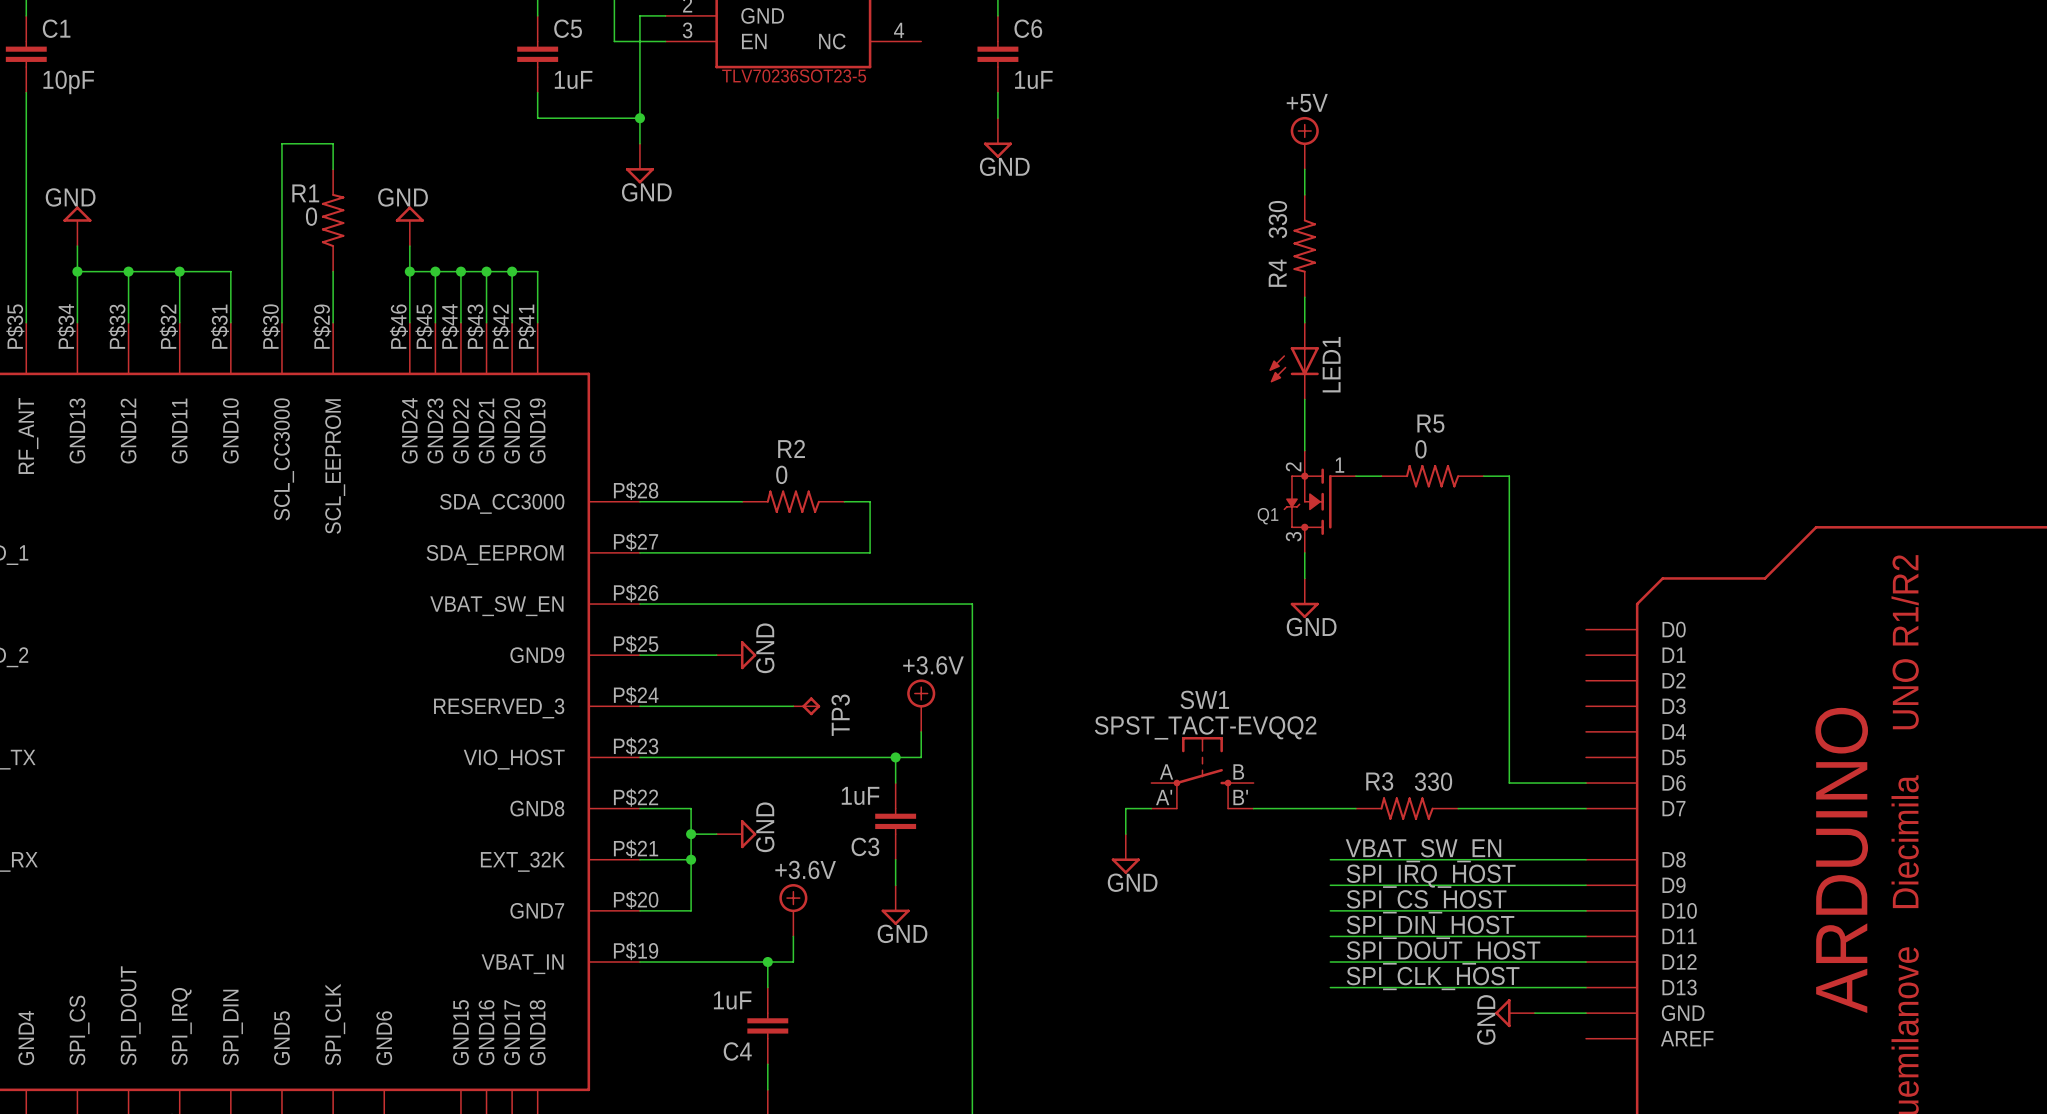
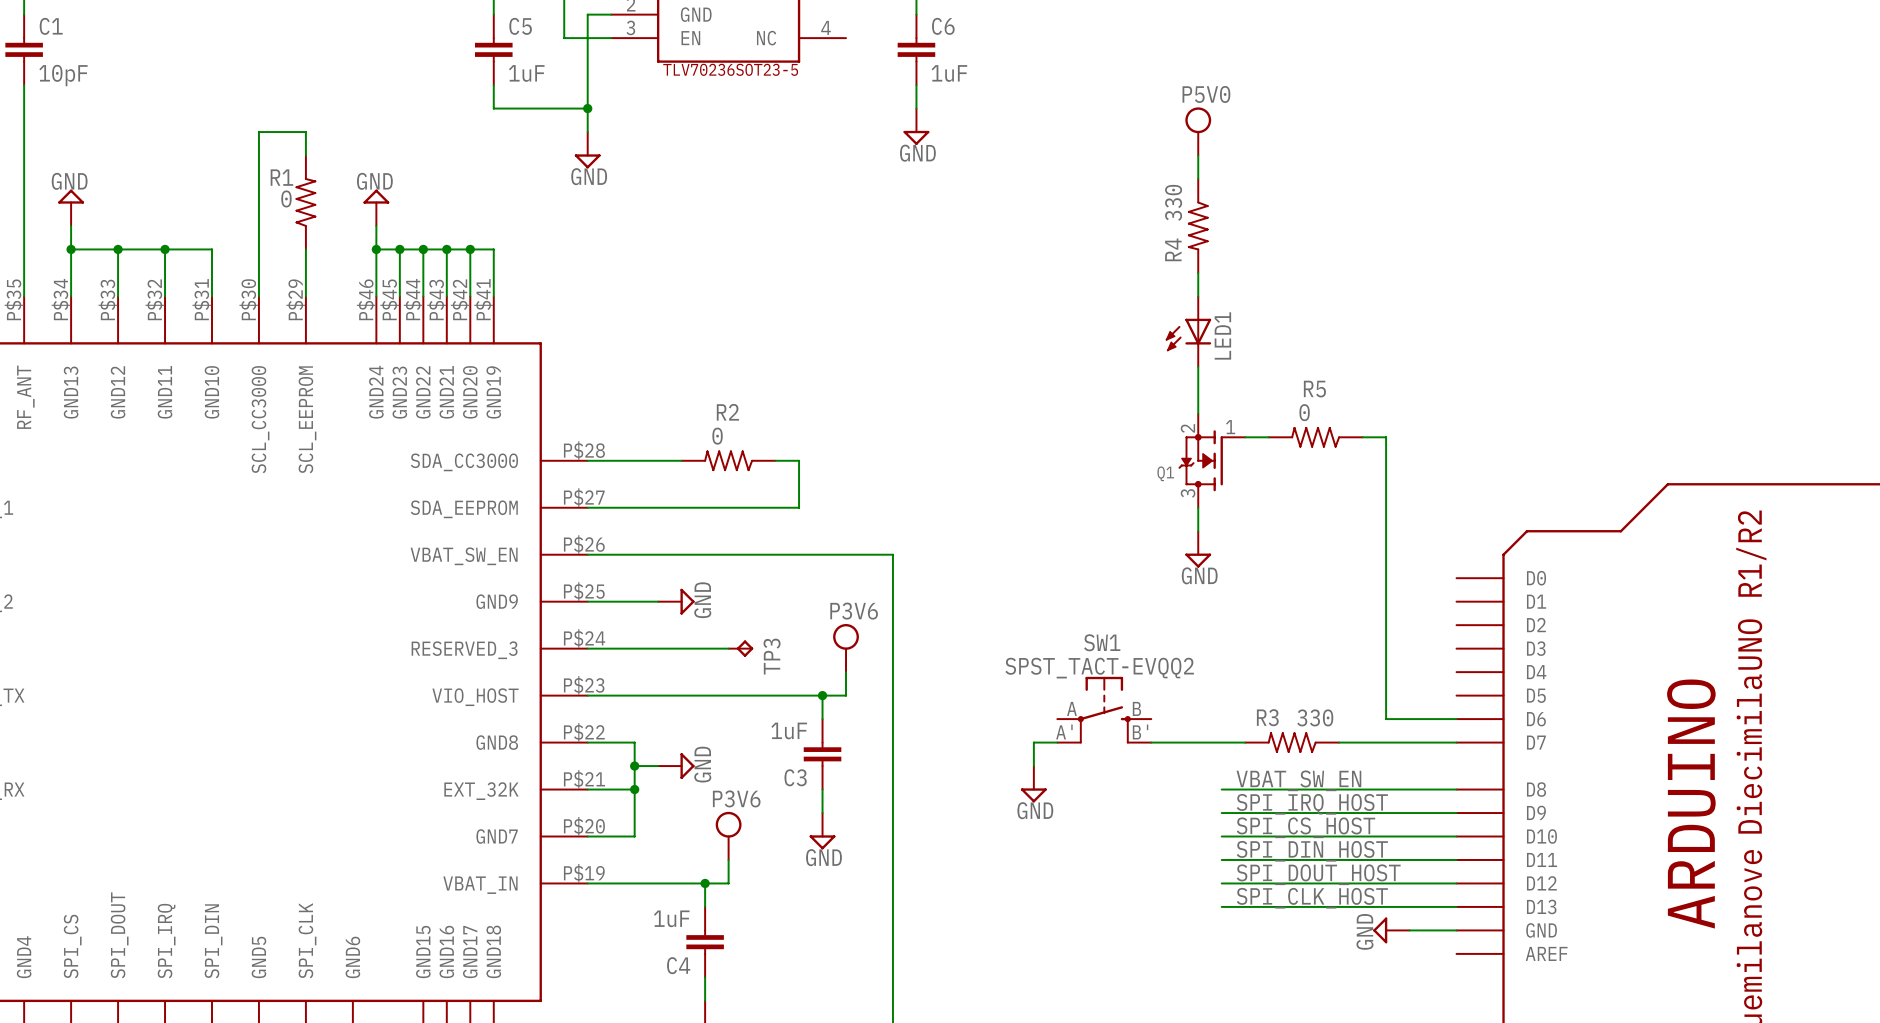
power symbol: +5V (1304, 143) -> P5V0 (1198, 131)
power symbol: +3.6V (921, 705) -> P3V6 (846, 648)
power symbol: +3.6V (793, 910) -> P3V6 (728, 835)

